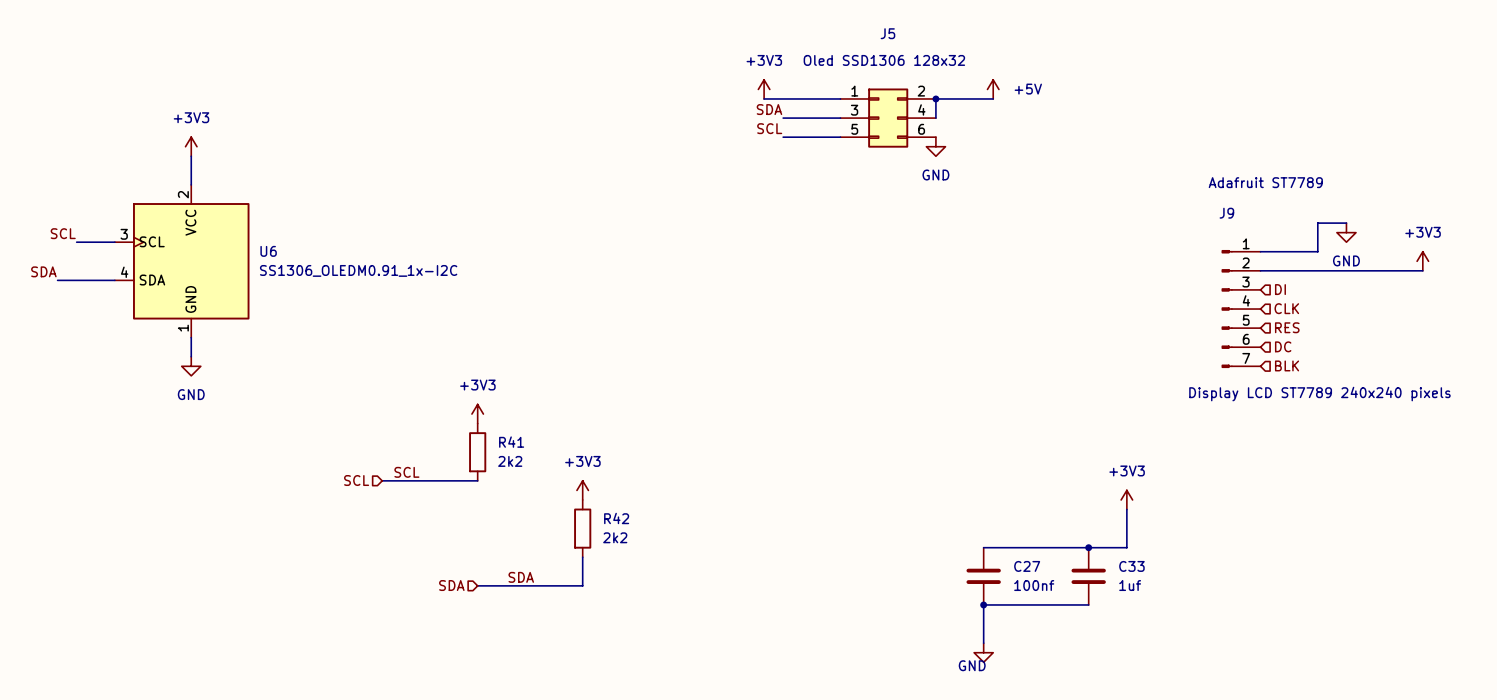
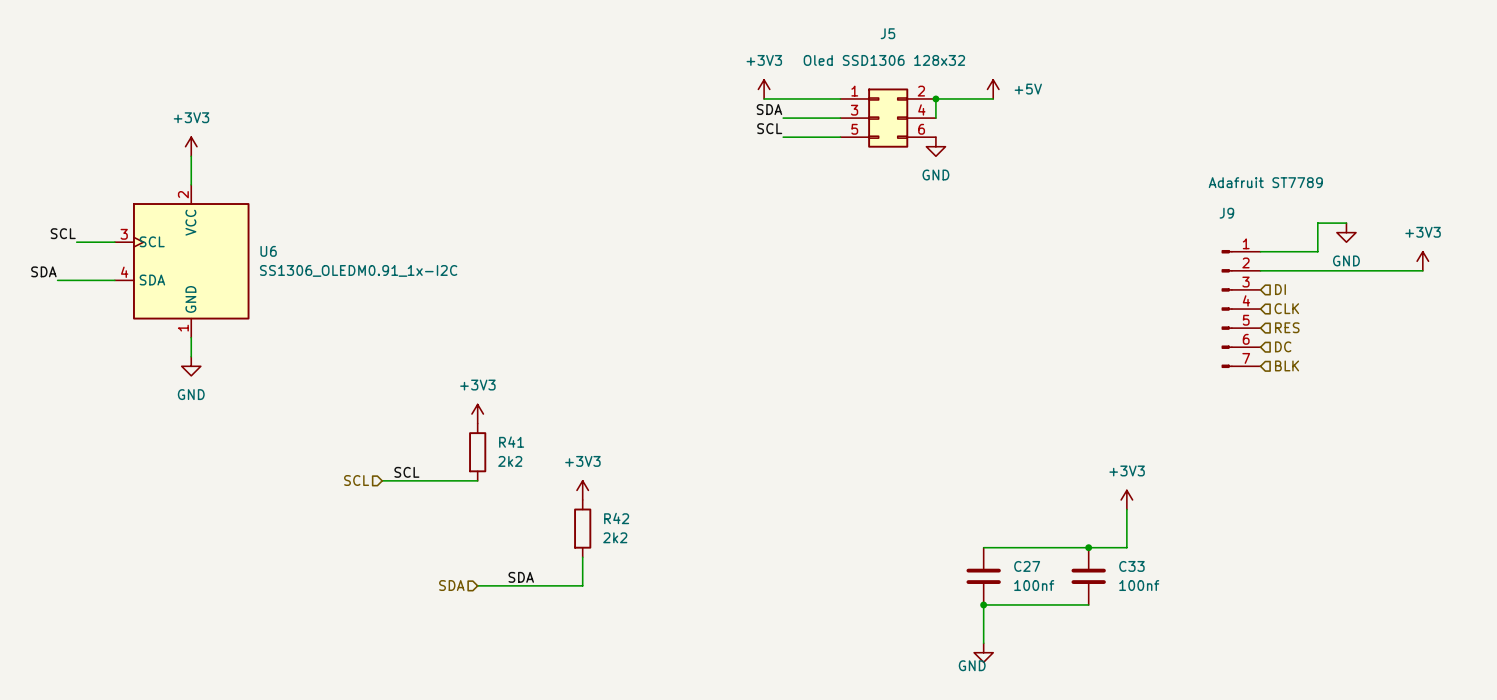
J9 text: Display LCD ST7789 240x240 pixels (1319, 394) -> none
C33 value: 1uf (1130, 585) -> 100nf (1139, 585)

